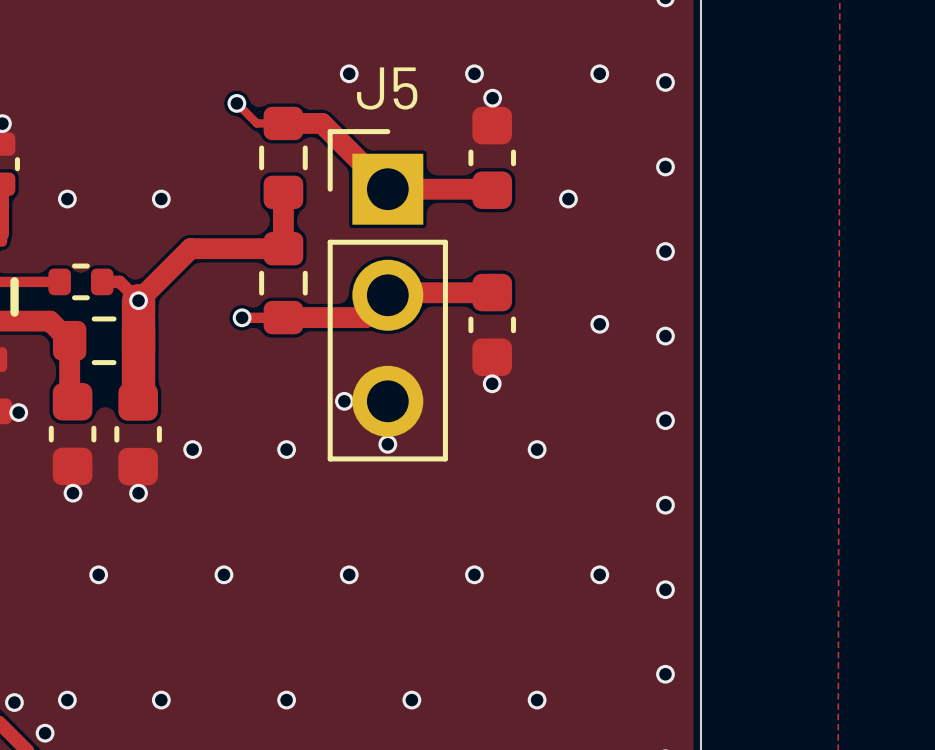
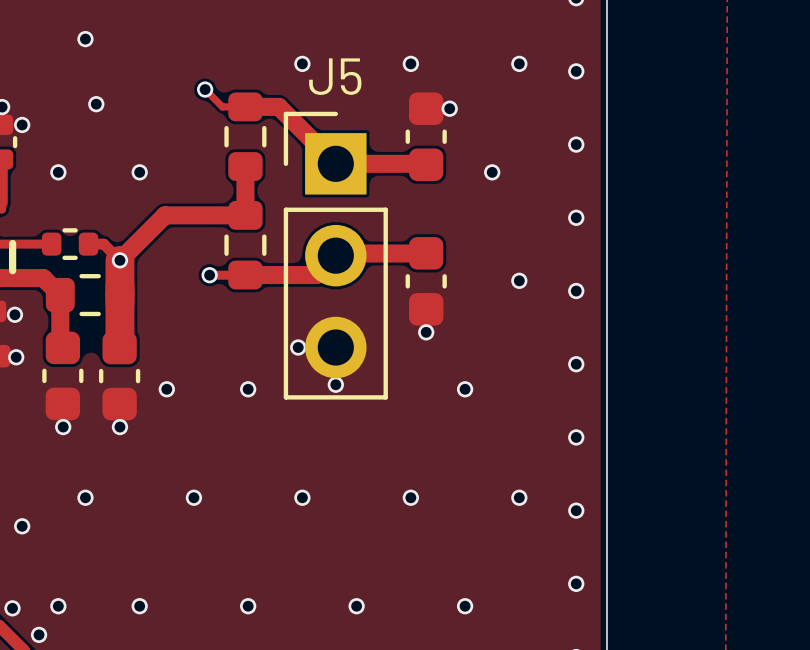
via: none -> (85, 39)
via position: (492, 98) -> (449, 108)
via: none -> (96, 104)
via: none -> (22, 124)
via: none -> (14, 314)
via: none -> (22, 526)

